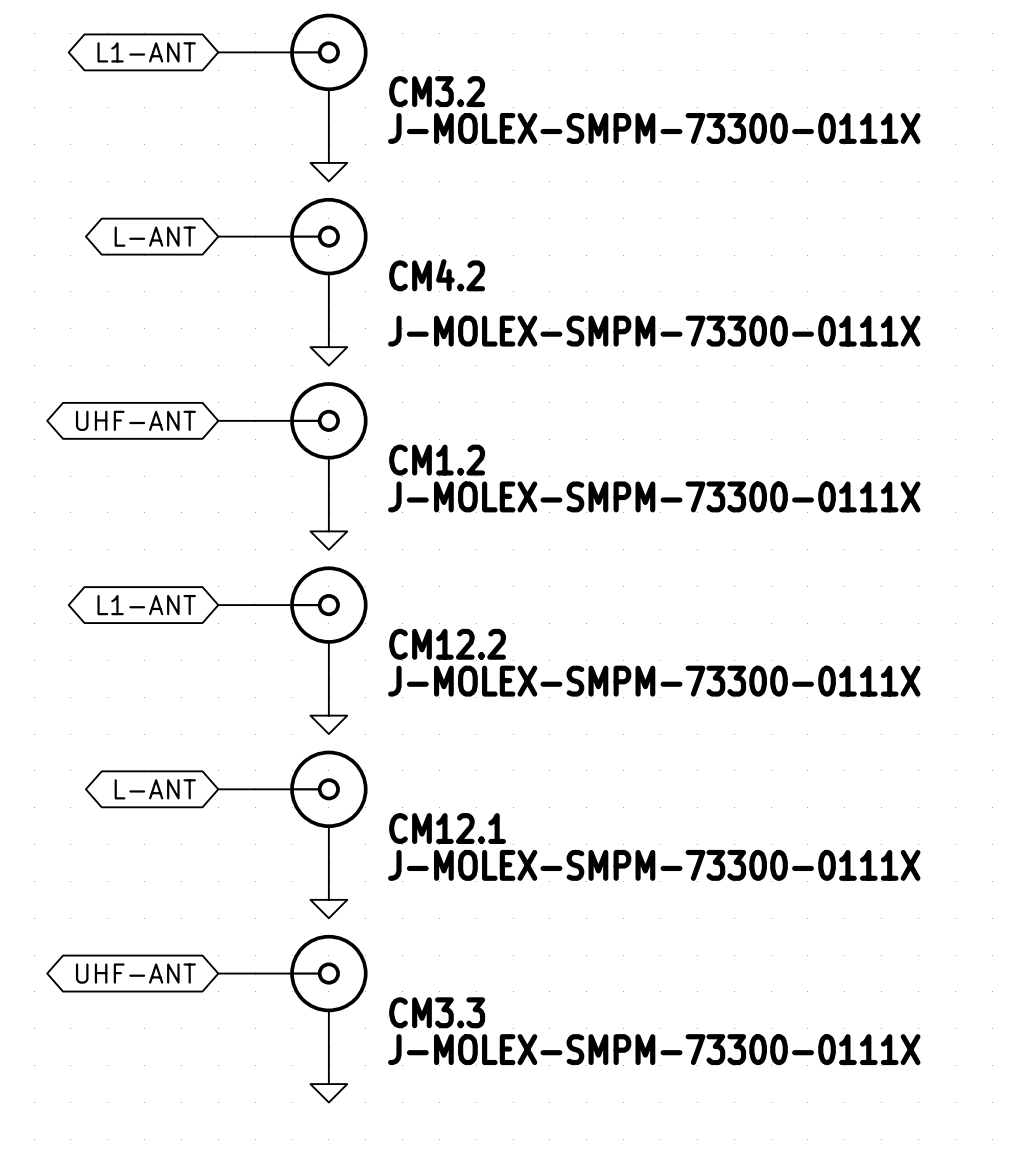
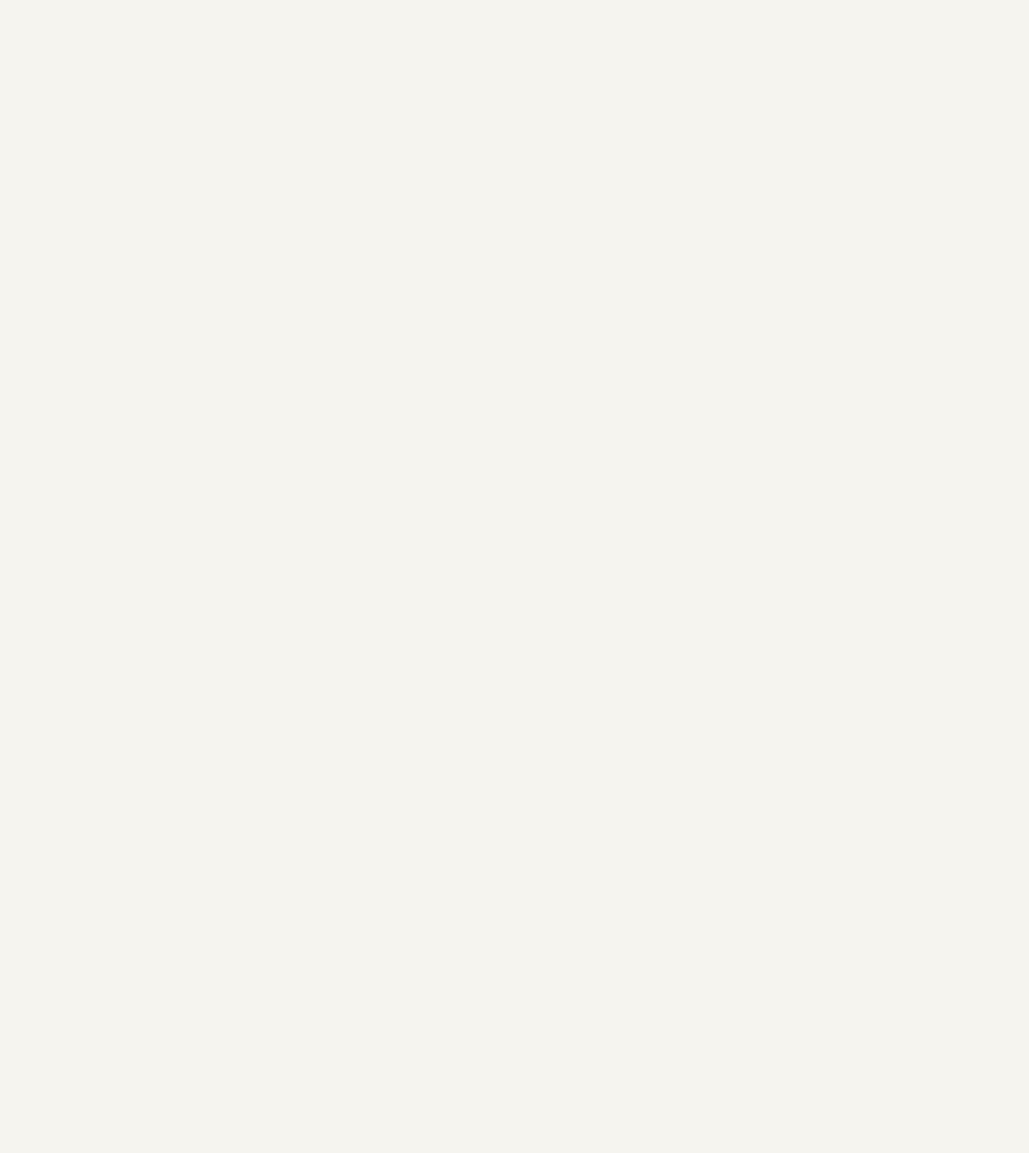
global label: L1-ANT (146, 52) -> none
wire: (218, 52) (255, 52) -> none
CM3.2: J-MOLEX-SMPM-73300-0111X (311, 69) -> none
wire: (328, 126) (328, 144) -> none
power symbol: (328, 162) -> none
global label: L-ANT (155, 236) -> none
wire: (218, 236) (255, 236) -> none
CM4.2: J-MOLEX-SMPM-73300-0111X (311, 254) -> none
wire: (328, 310) (328, 328) -> none
power symbol: (328, 347) -> none
global label: UHF-ANT (135, 420) -> none
wire: (218, 420) (255, 420) -> none
CM1.2: J-MOLEX-SMPM-73300-0111X (311, 438) -> none
wire: (328, 494) (328, 512) -> none
power symbol: (328, 531) -> none
global label: L1-ANT (146, 605) -> none
wire: (218, 605) (255, 605) -> none
CM12.2: J-MOLEX-SMPM-73300-0111X (311, 622) -> none
wire: (328, 678) (328, 697) -> none
power symbol: (328, 715) -> none
global label: L-ANT (155, 789) -> none
wire: (218, 789) (255, 789) -> none
CM12.1: J-MOLEX-SMPM-73300-0111X (311, 806) -> none
wire: (328, 863) (328, 881) -> none
power symbol: (328, 899) -> none
global label: UHF-ANT (135, 973) -> none
wire: (218, 973) (255, 973) -> none
CM3.3: J-MOLEX-SMPM-73300-0111X (311, 991) -> none
wire: (328, 1047) (328, 1065) -> none
power symbol: (328, 1084) -> none

